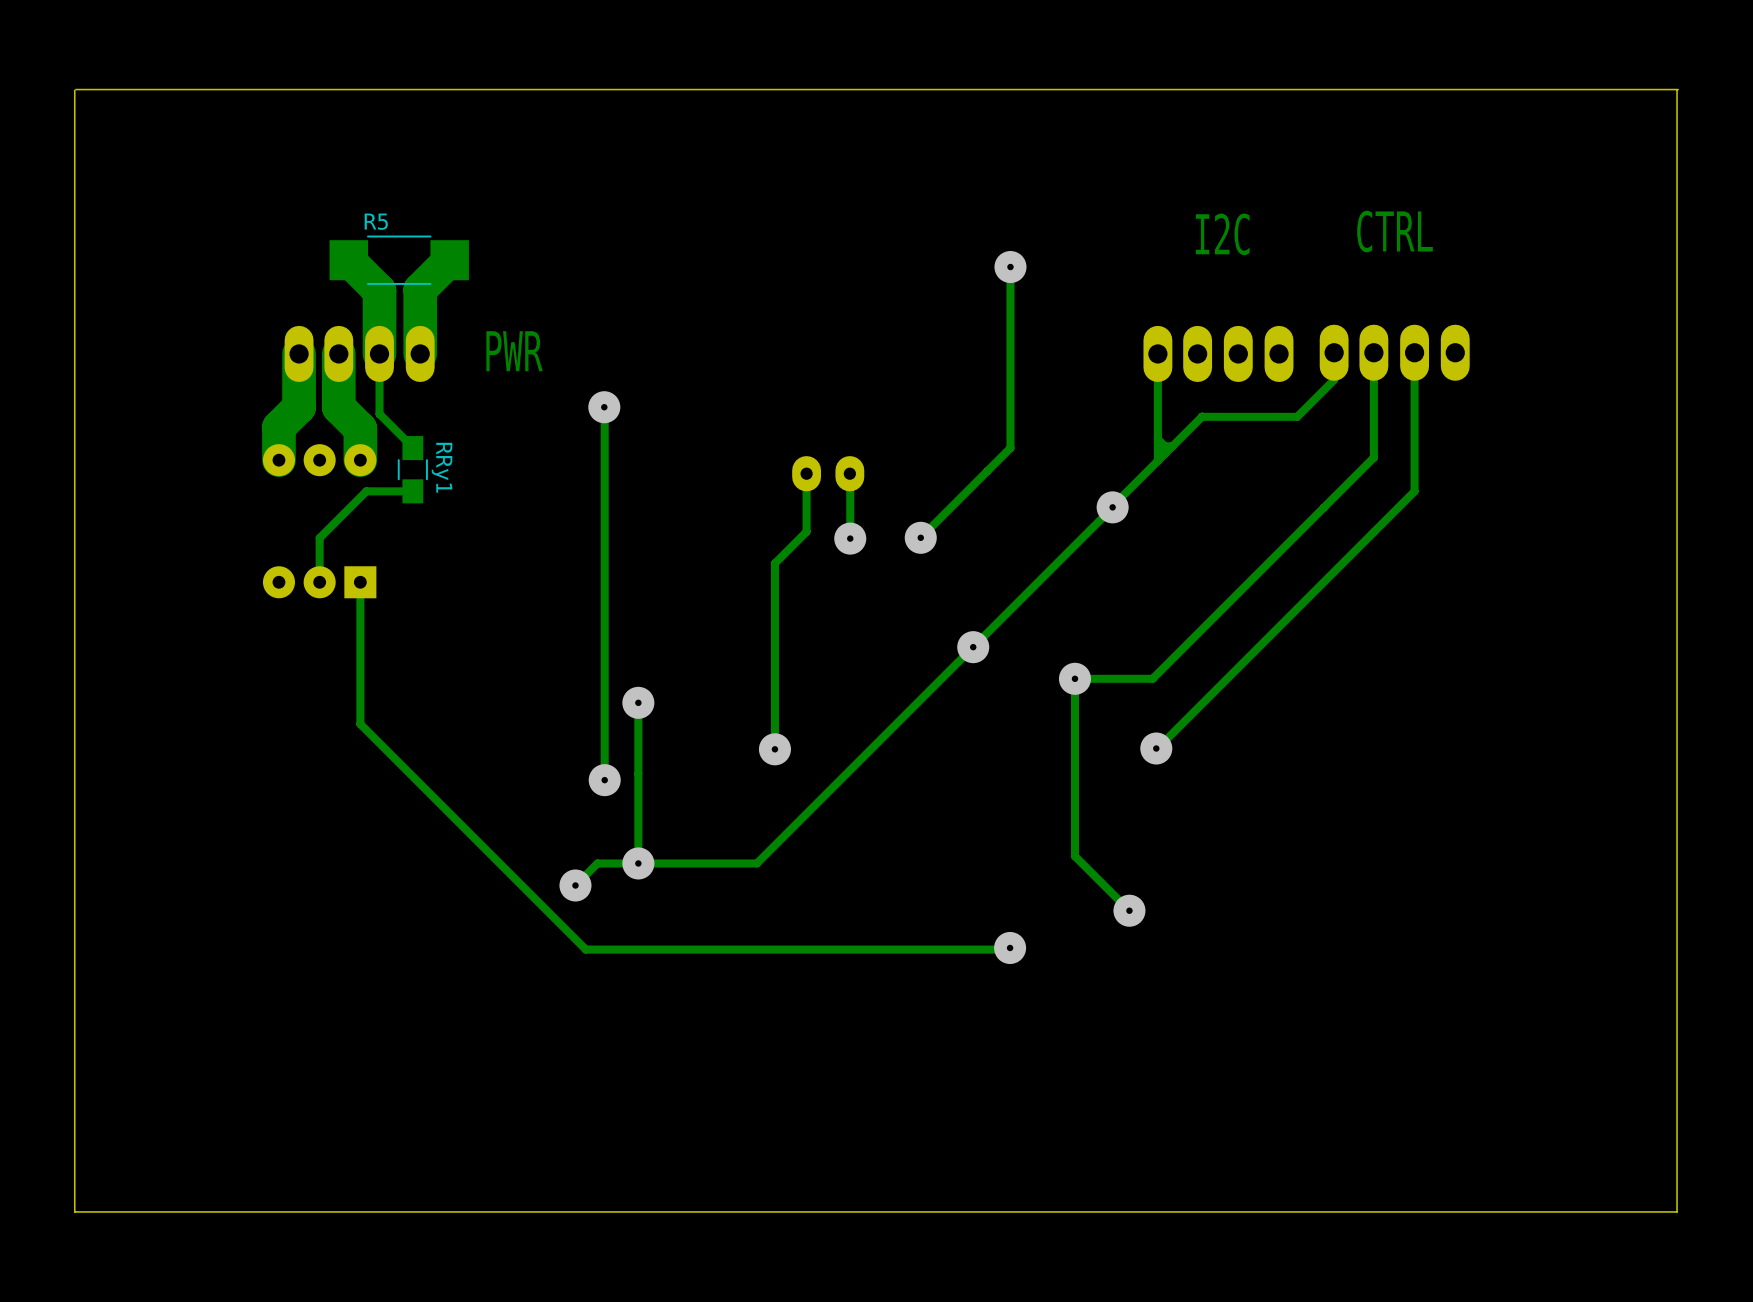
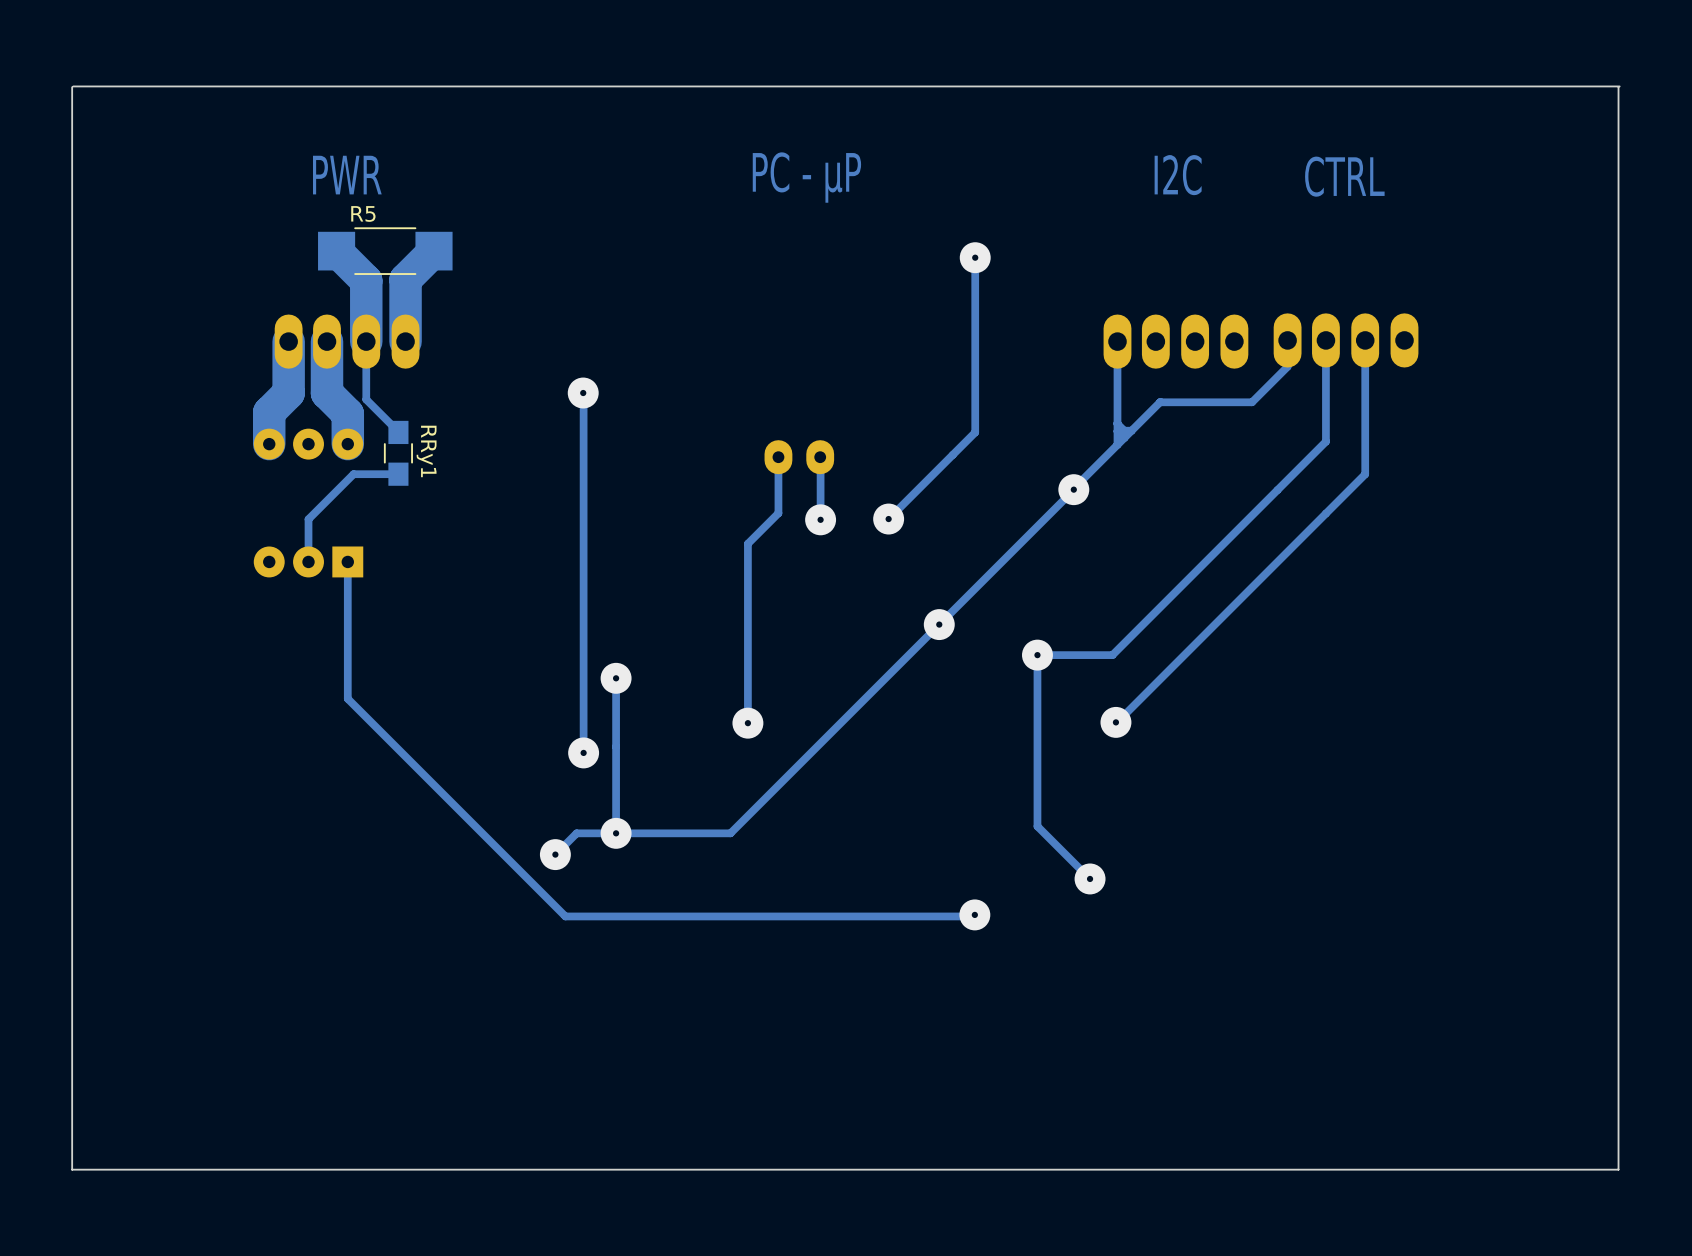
text: none -> PC - µP (806, 177)
text position: CTRL (1394, 231) -> CTRL (1344, 176)
text position: I2C (1222, 234) -> I2C (1178, 175)
text position: PWR (514, 351) -> PWR (347, 175)

